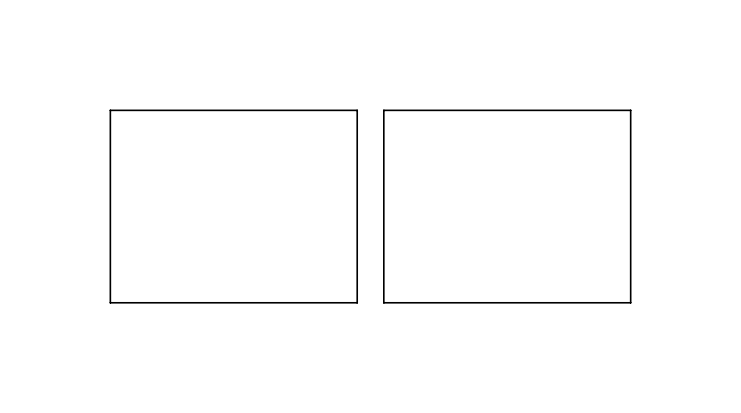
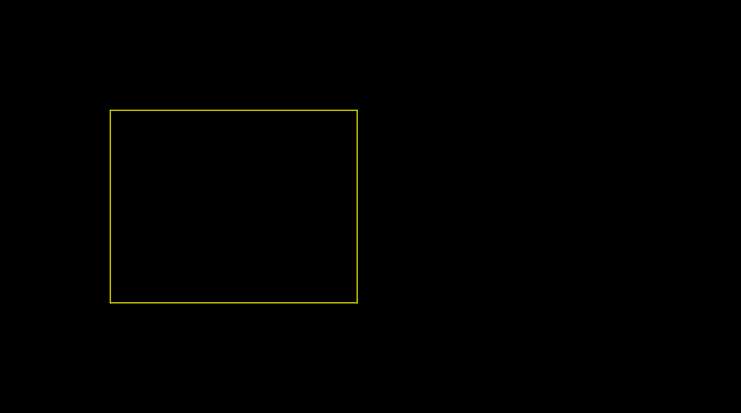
board edge: (383, 110) (630, 110) (630, 302) (383, 302) (383, 110) -> none

